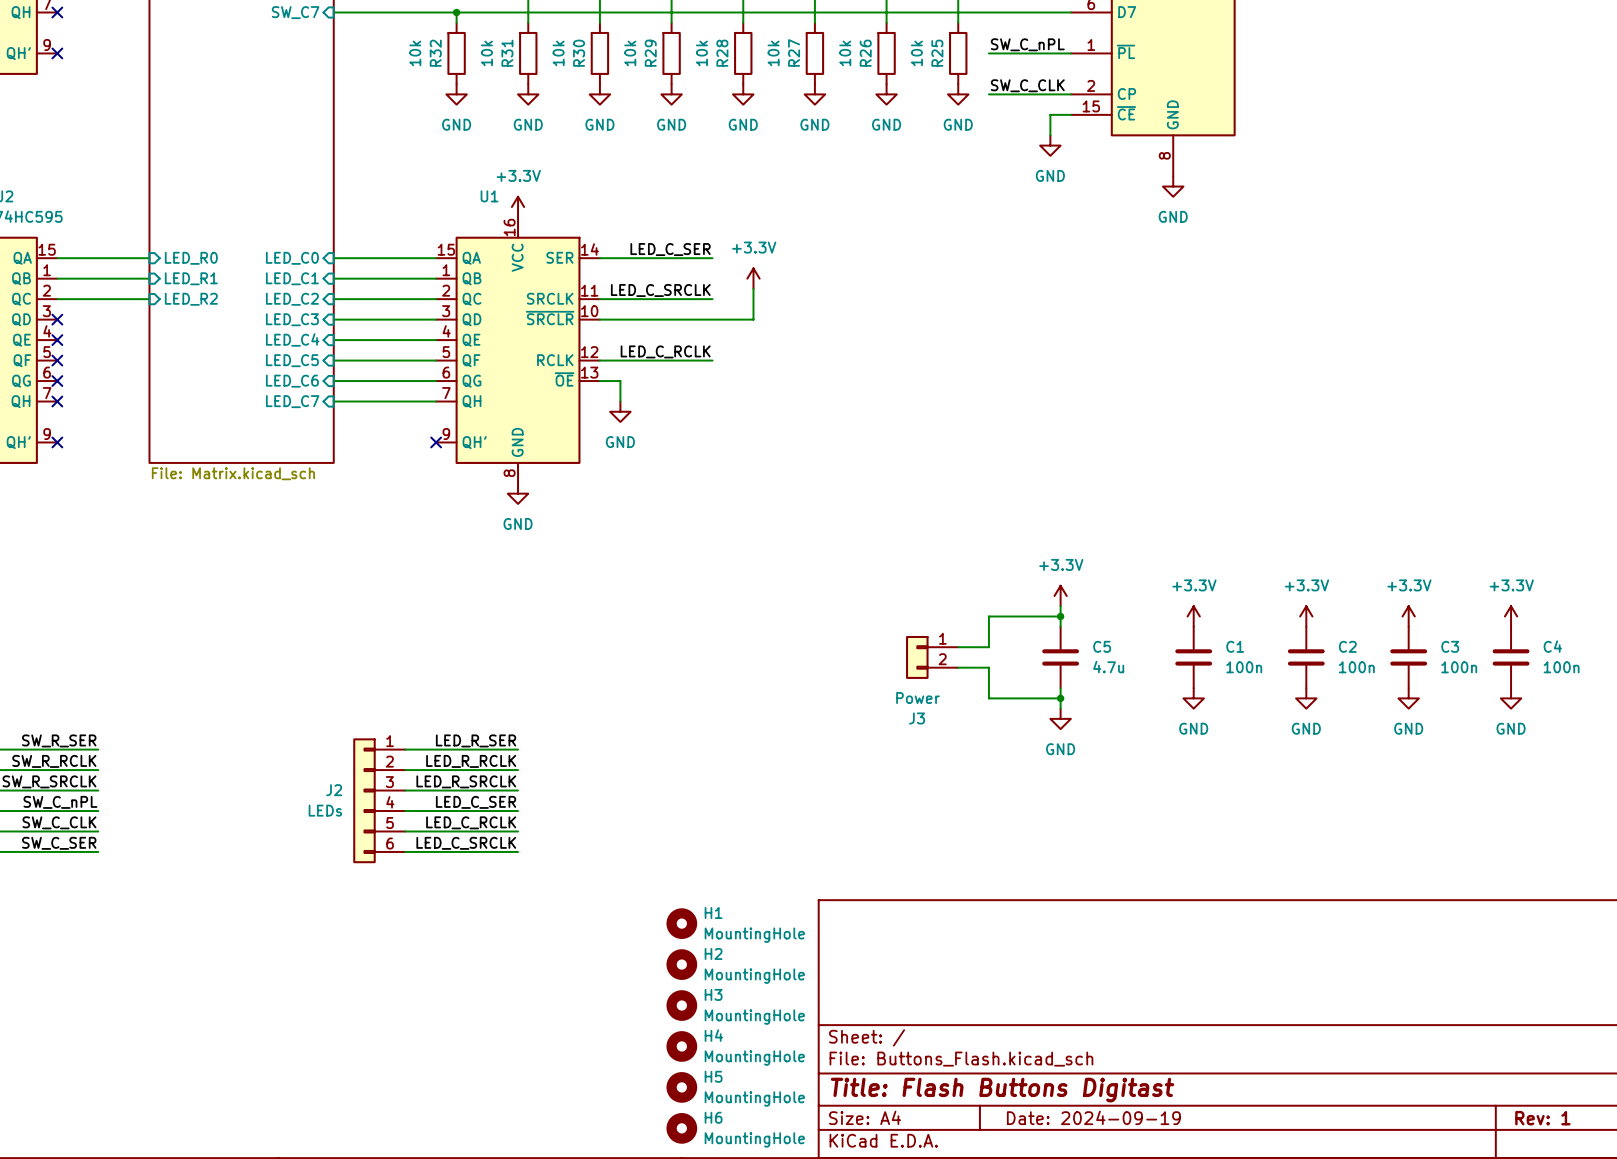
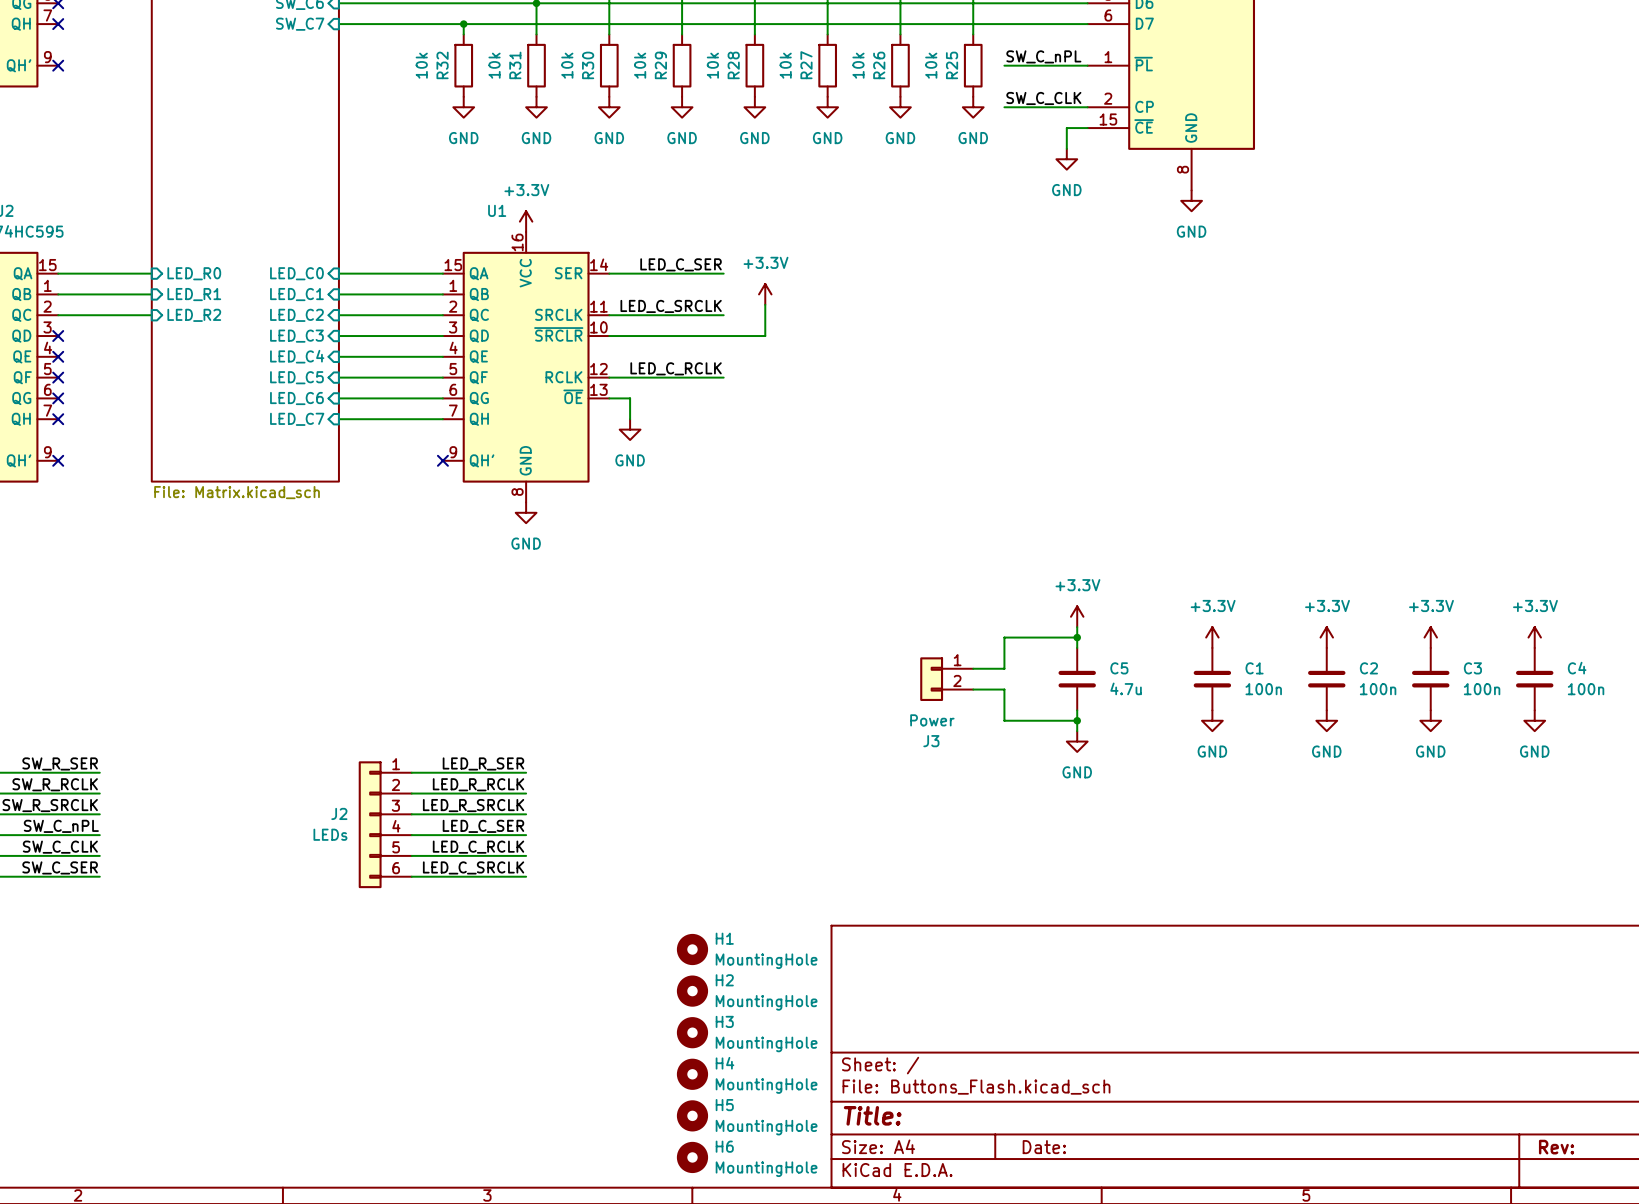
title block: Title: Flash Buttons Digitast (1002, 1090) -> Title: (872, 1115)
title block: Date: 2024-09-19 (1093, 1117) -> Date: (1044, 1147)
title block: Rev: 1 (1542, 1118) -> Rev: (1556, 1147)

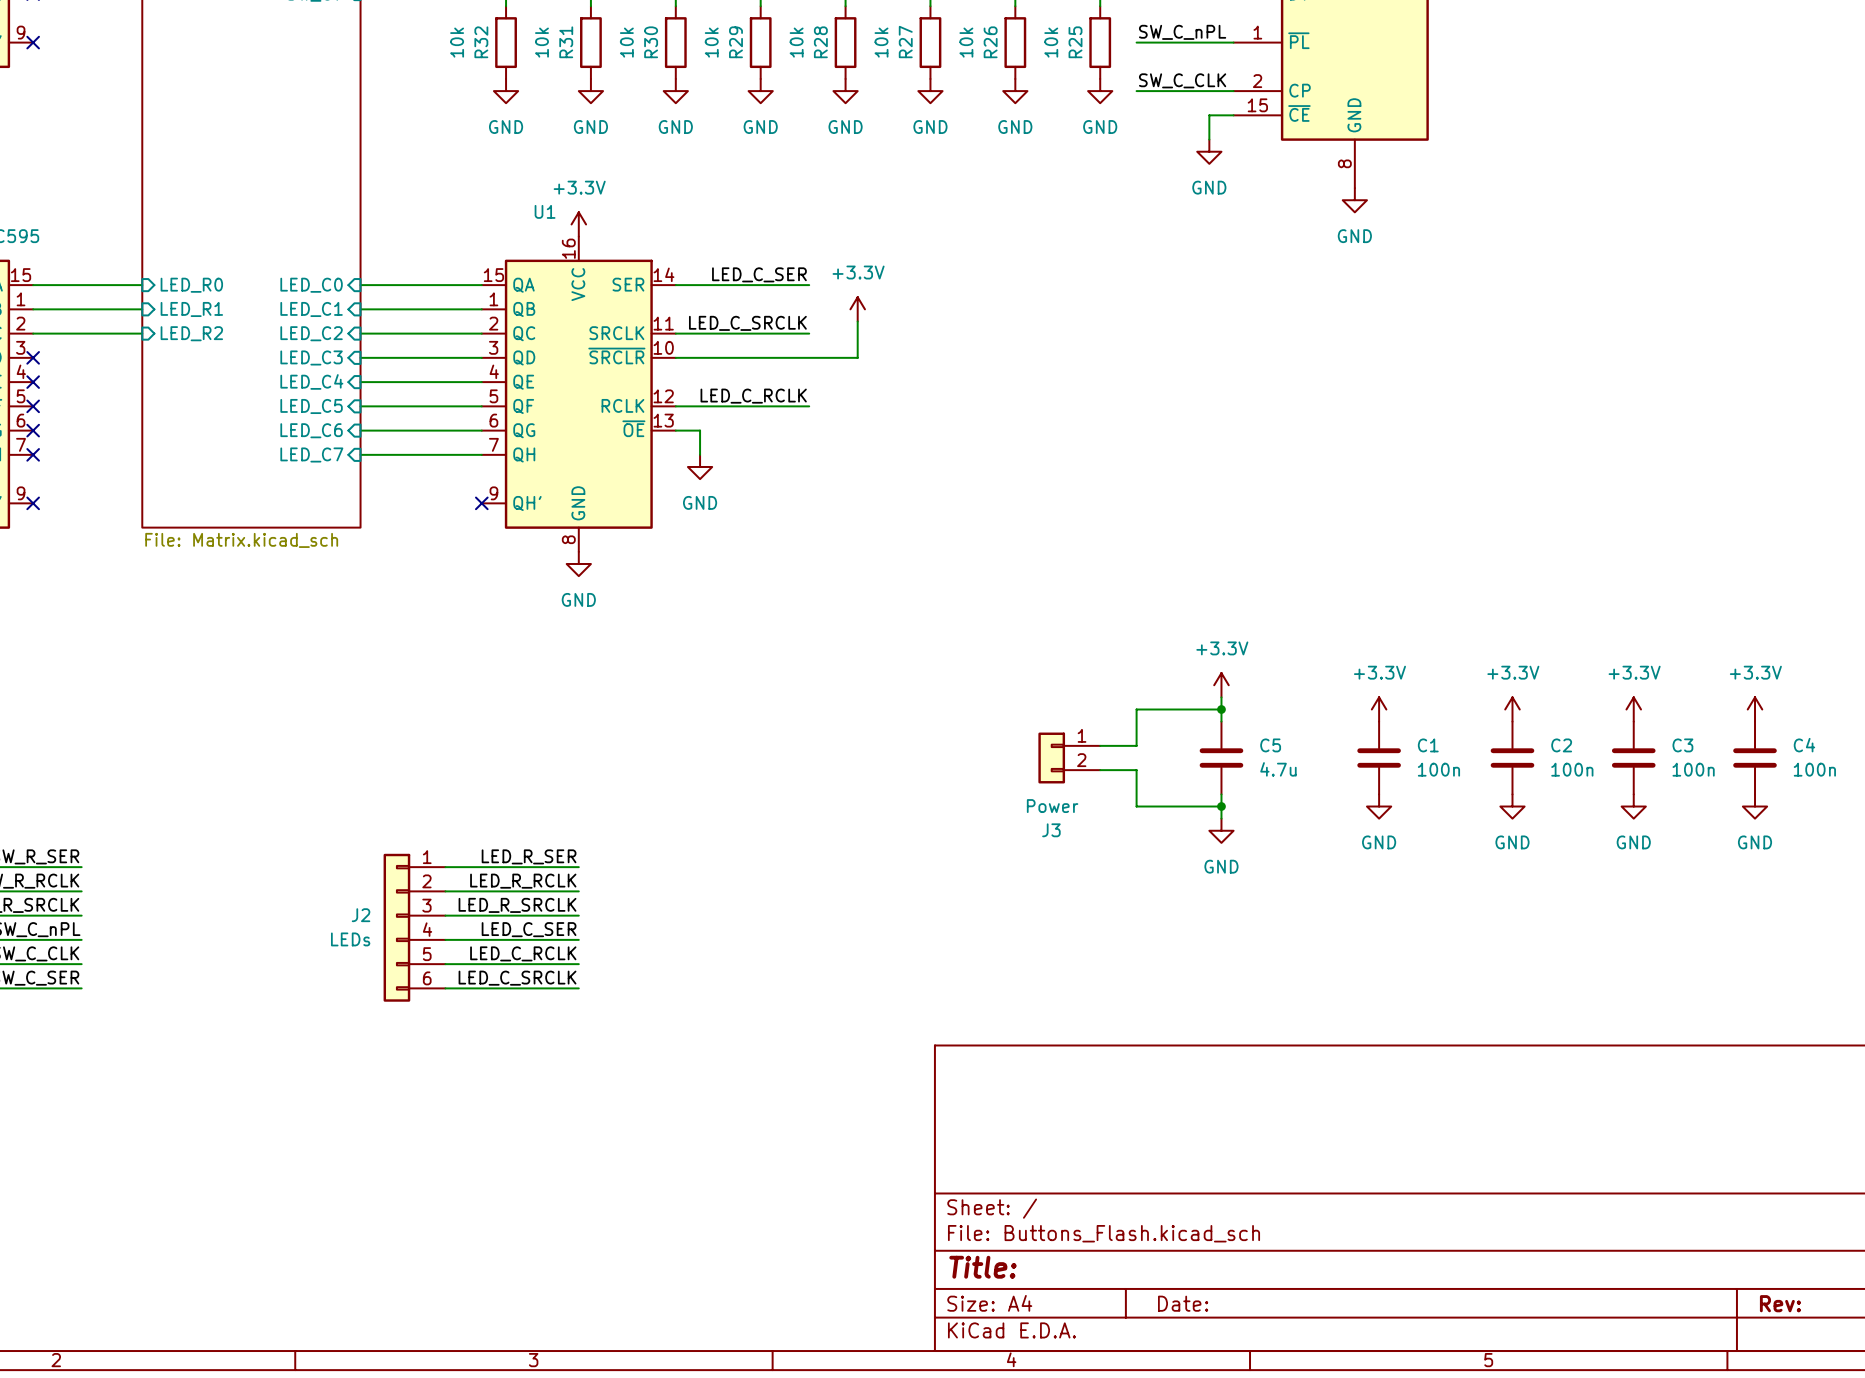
H1: MountingHole (692, 949) -> none
H2: MountingHole (692, 991) -> none
H3: MountingHole (692, 1032) -> none
H4: MountingHole (692, 1074) -> none
H5: MountingHole (692, 1115) -> none
H6: MountingHole (692, 1157) -> none

